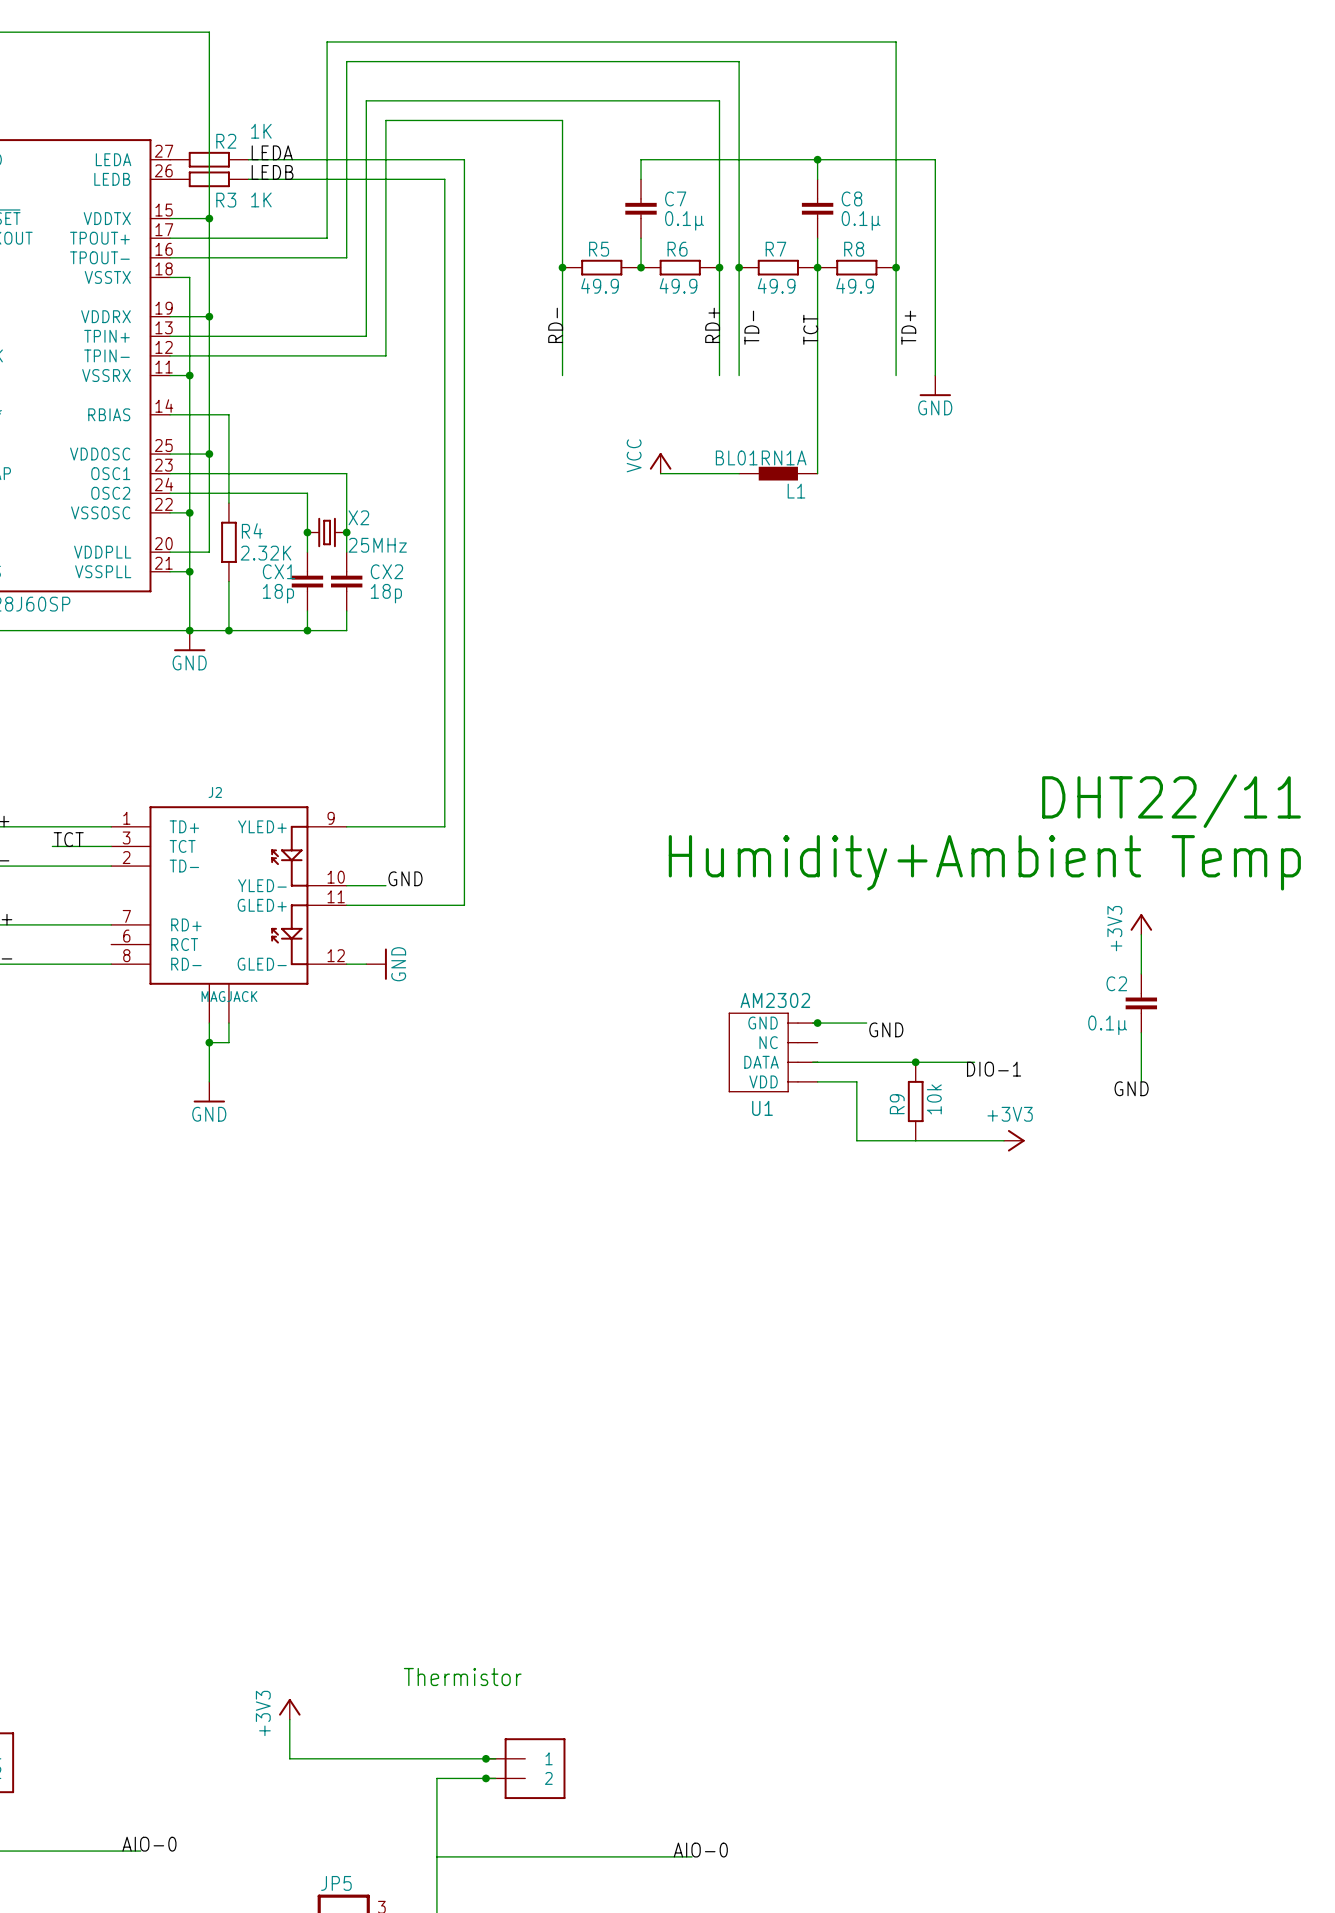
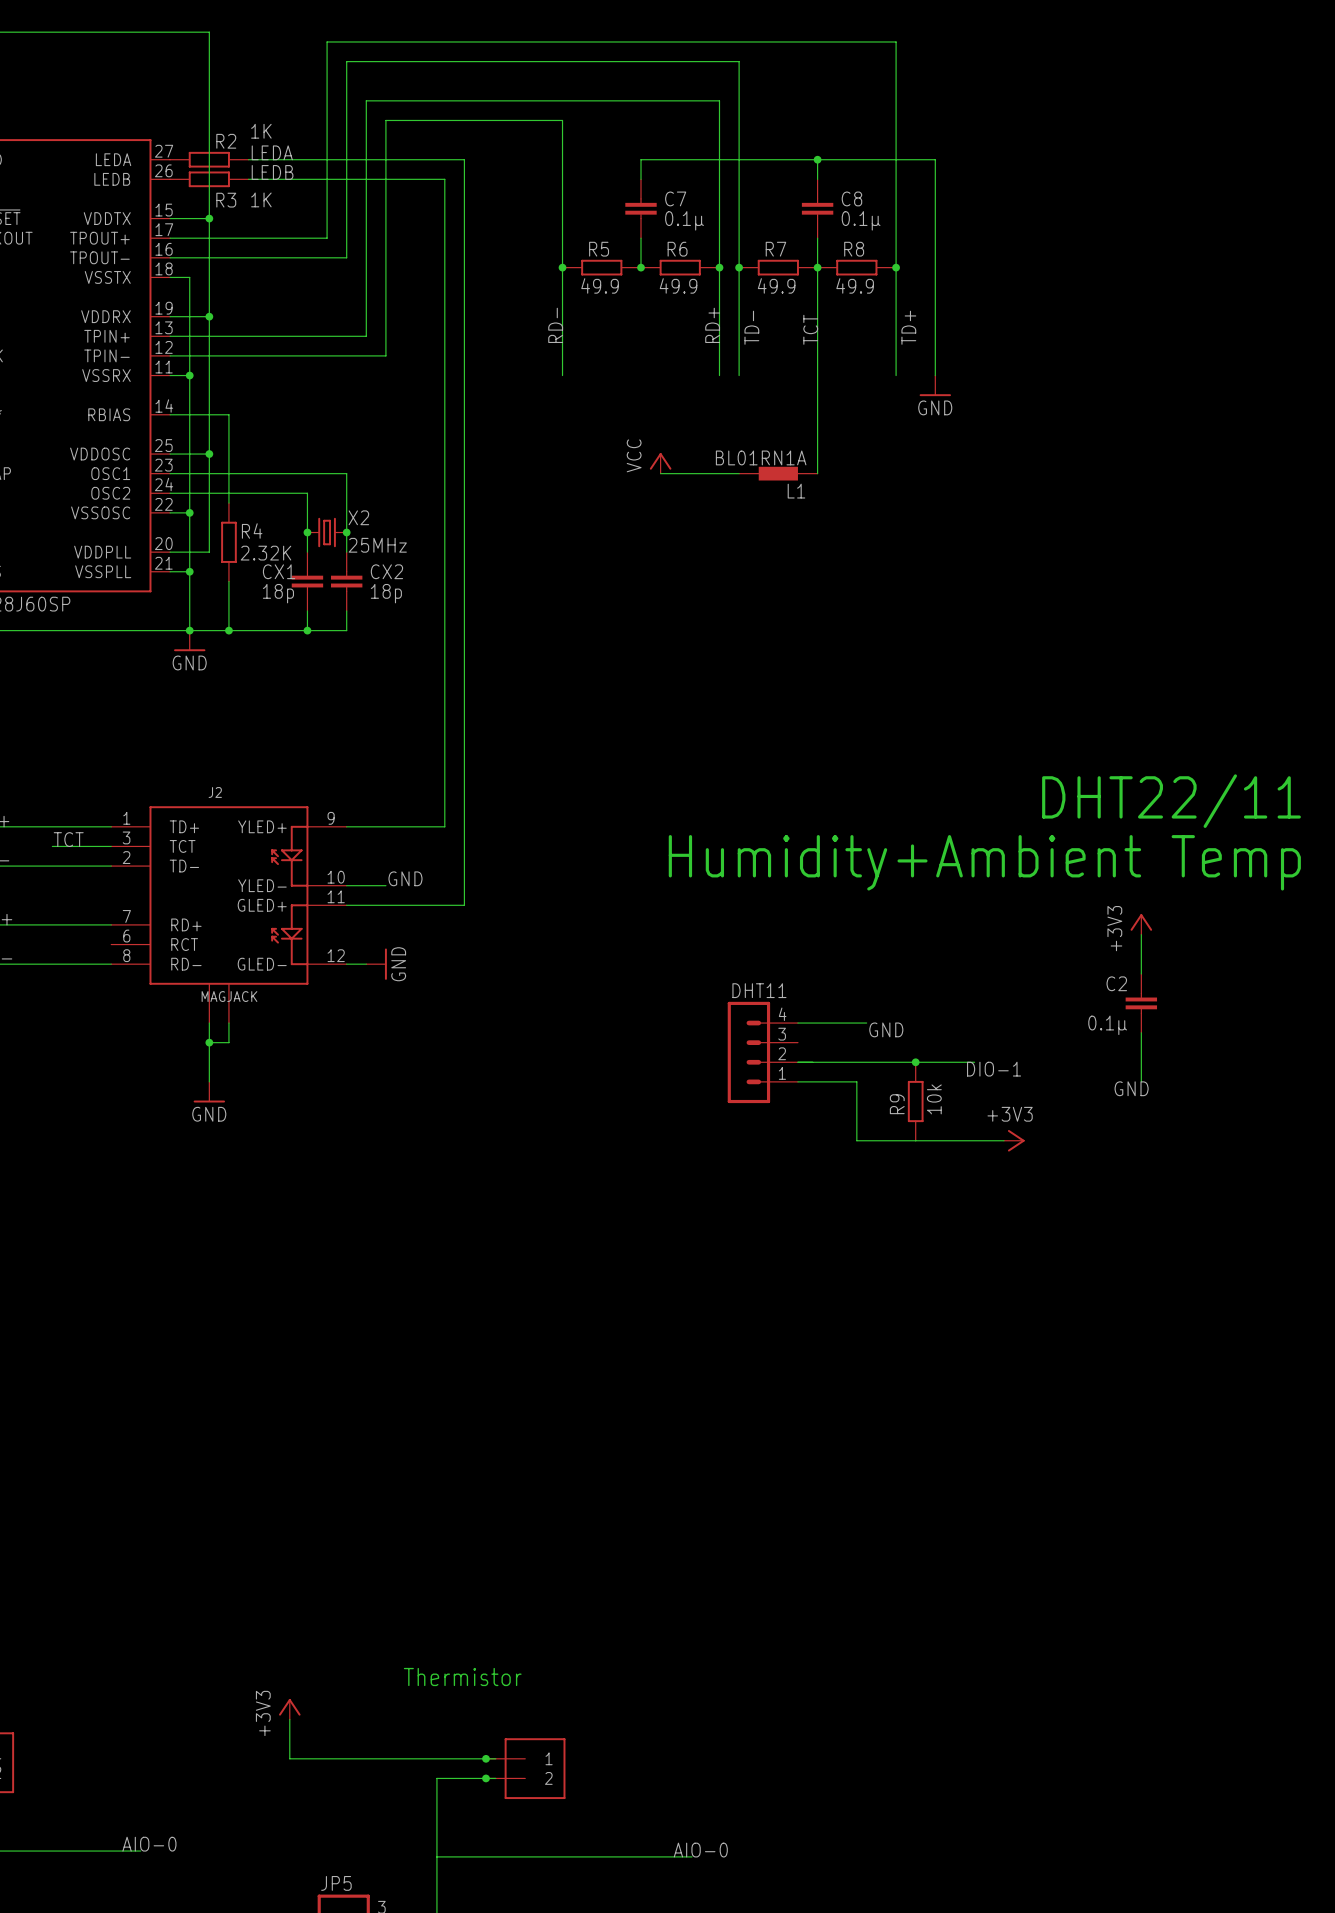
junction: (817, 1023) -> none
DHT11: none -> (762, 1052)
U1: AM2302 (773, 1052) -> none

